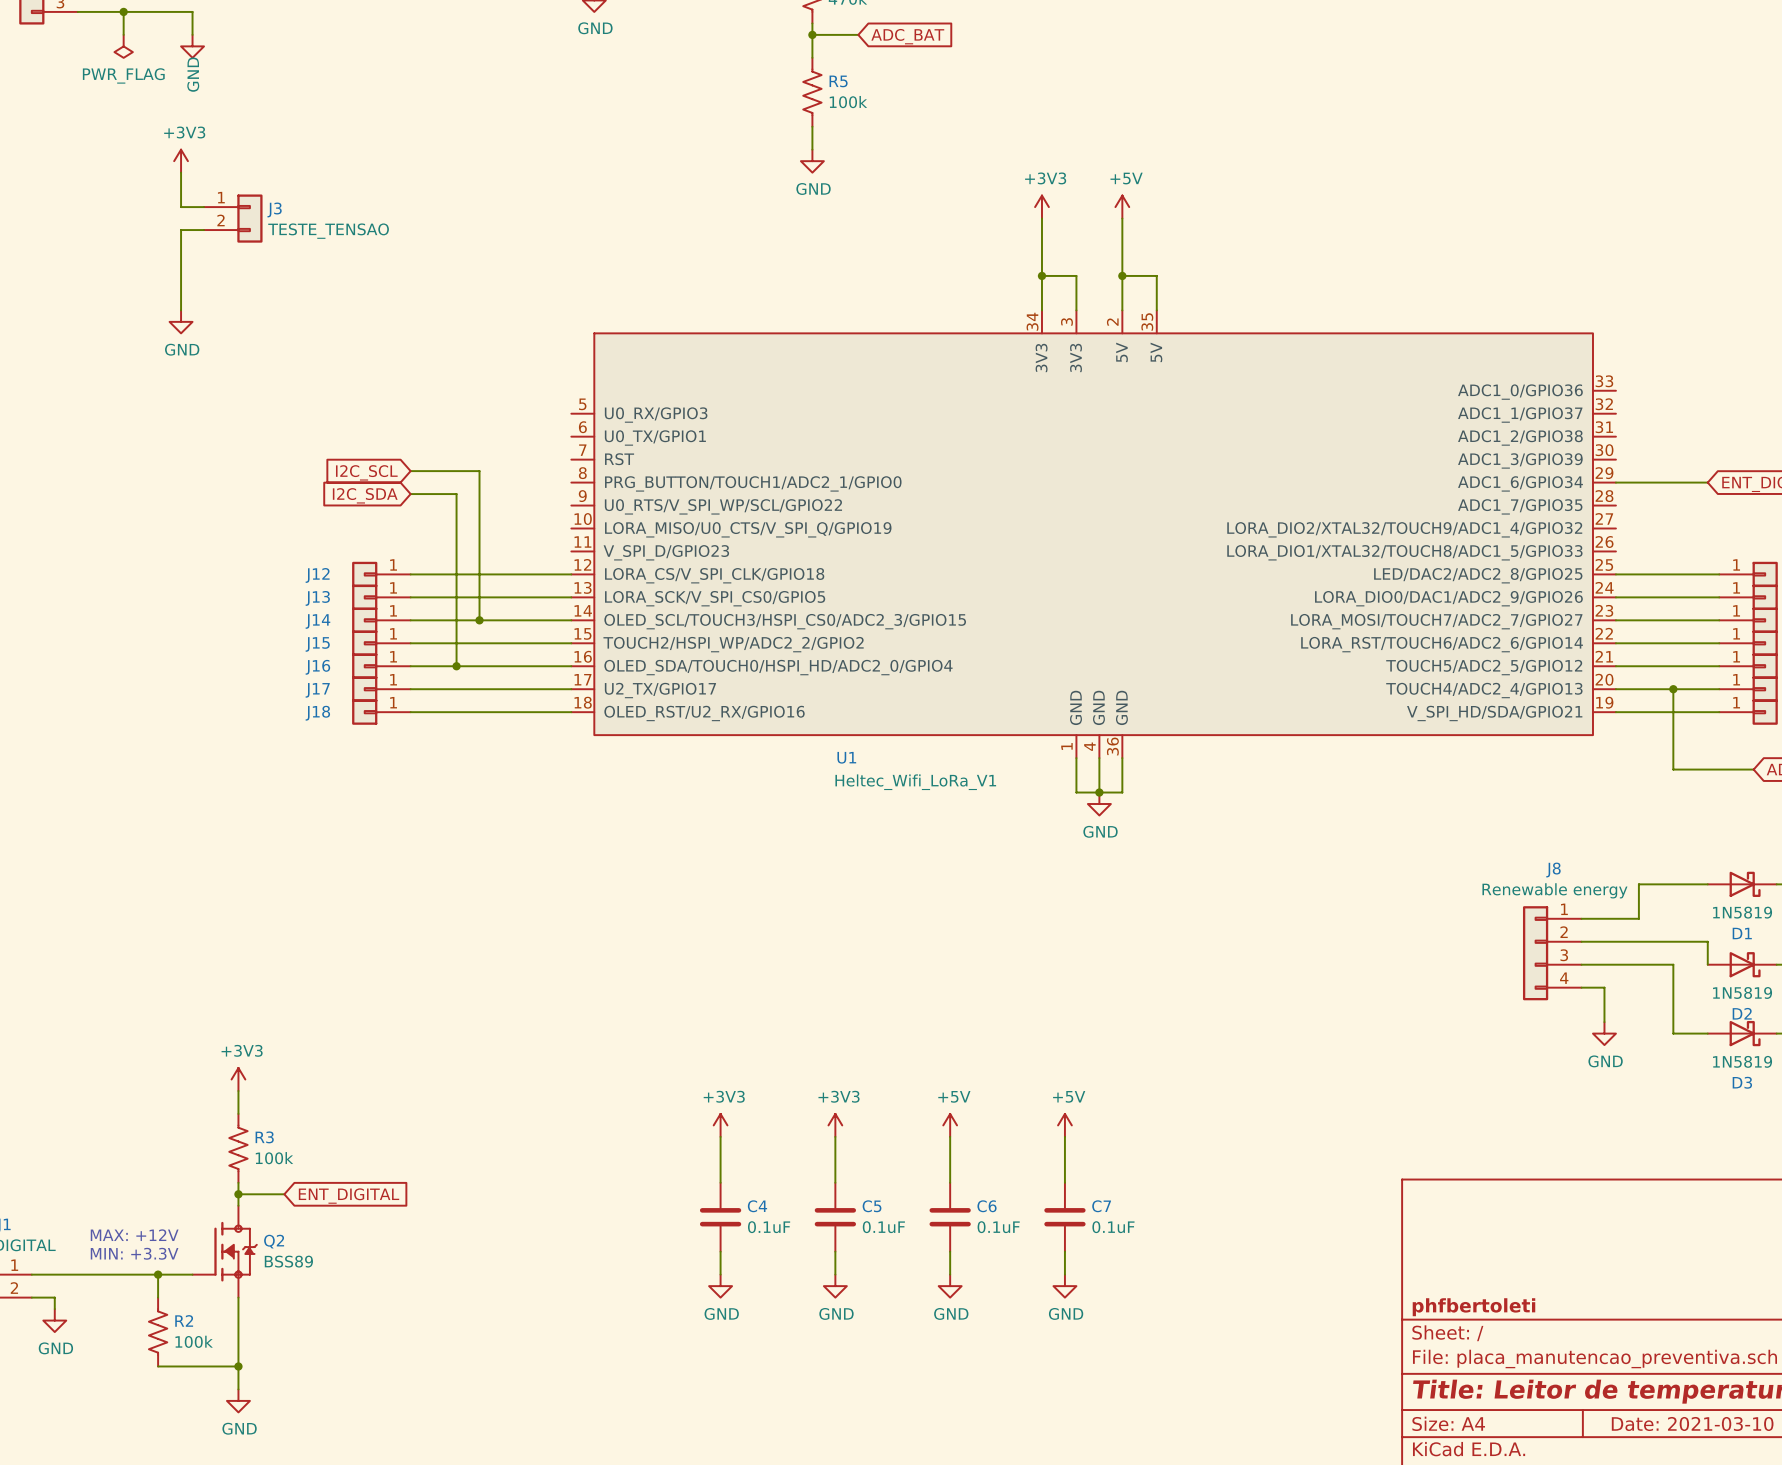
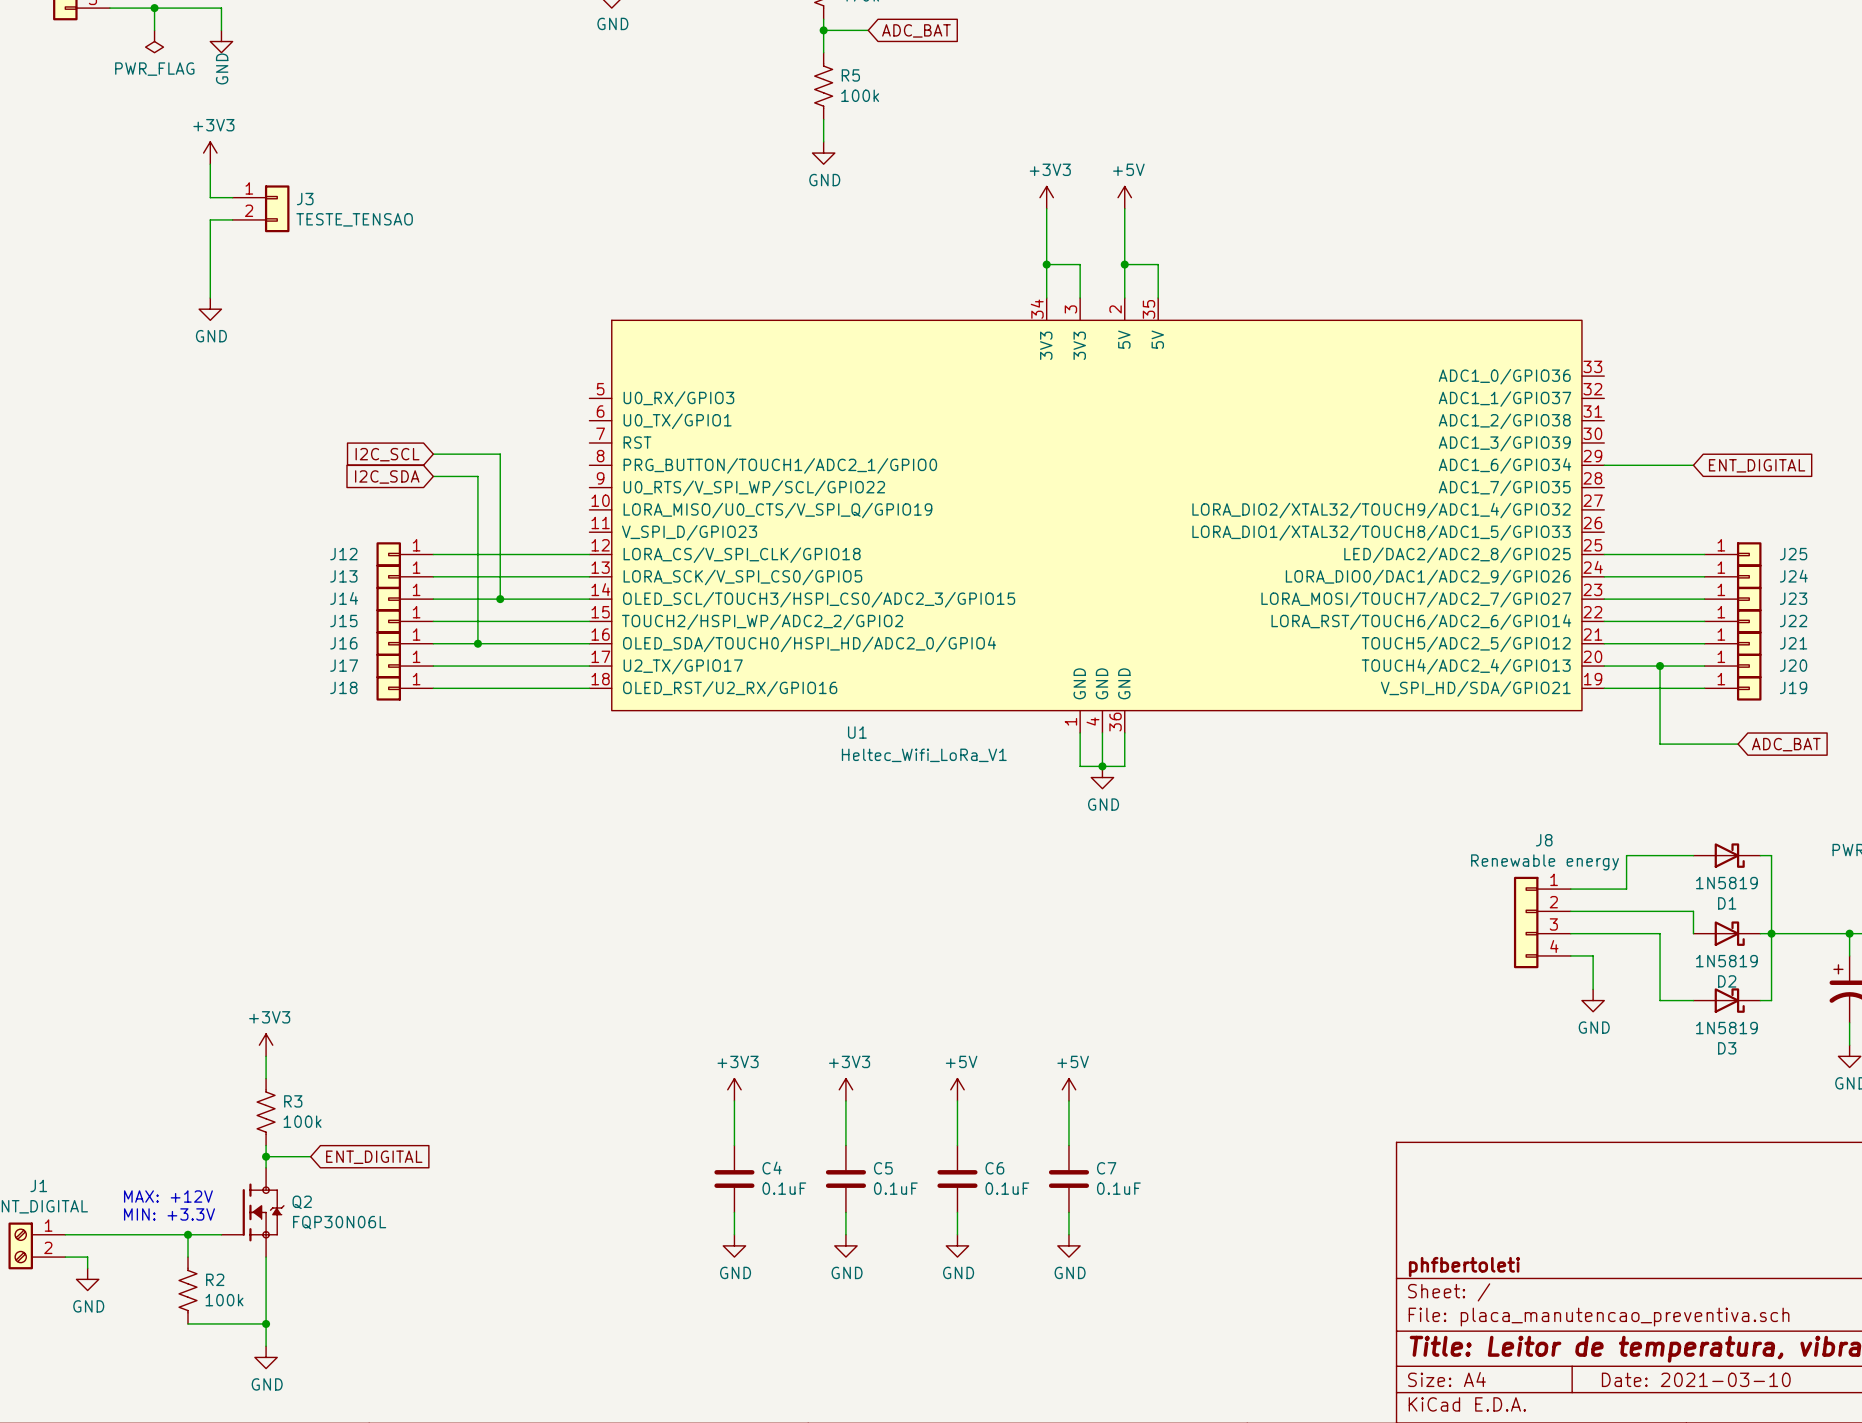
Q2 value: BSS89 (288, 1261) -> FQP30N06L (339, 1222)

